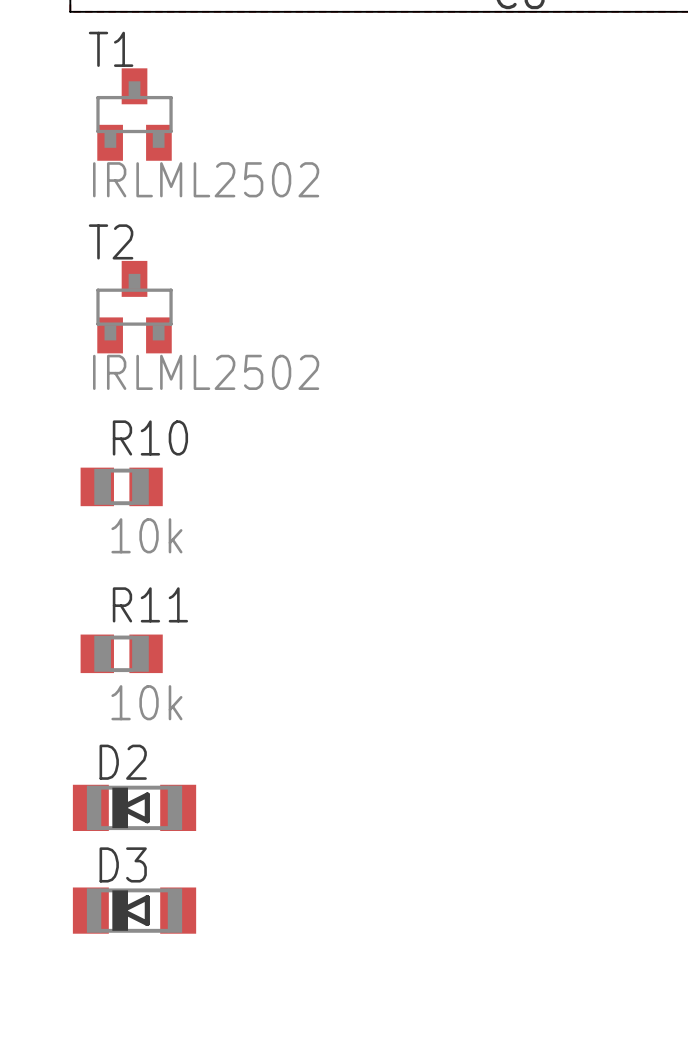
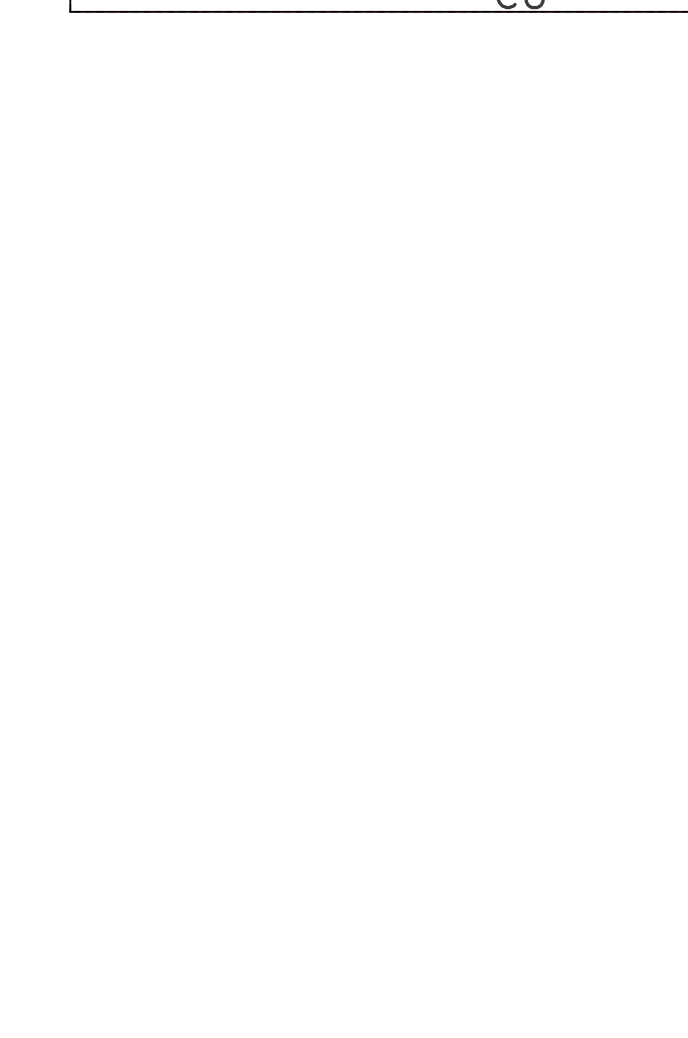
T1: IRLML2502 (134, 114) -> none
T2: IRLML2502 (134, 307) -> none
R10: 10k (121, 486) -> none
R11: 10k (121, 653) -> none
D2: (134, 807) -> none
D3: (134, 910) -> none

